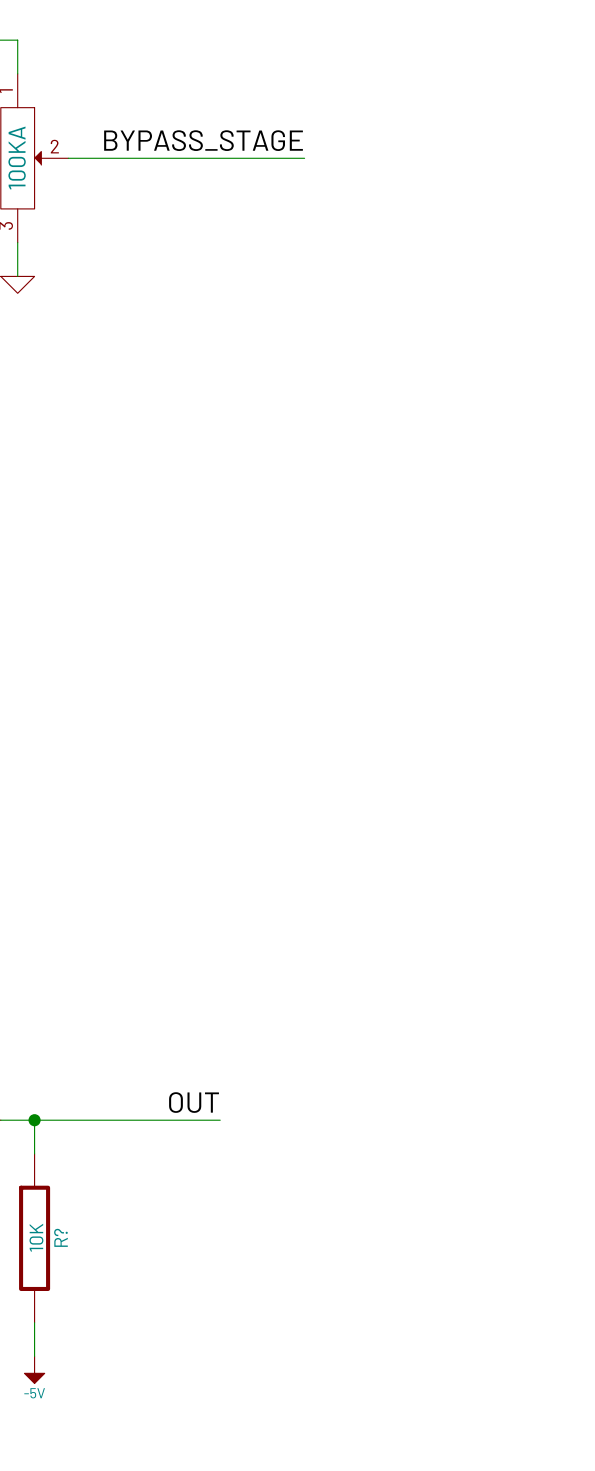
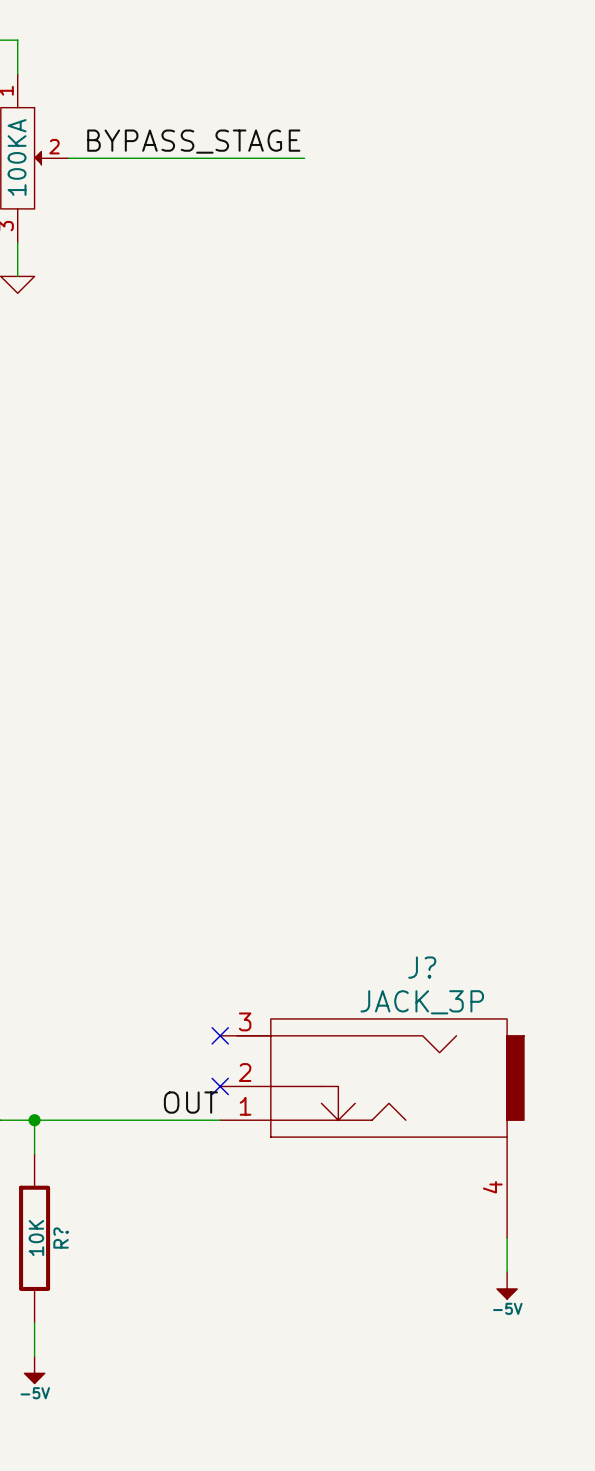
no-connect mark: none -> (220, 1035)
no-connect mark: none -> (220, 1086)
J?: none -> JACK_3P (372, 1128)
wire: none -> (507, 1238) (507, 1272)
power symbol: none -> -5V (507, 1285)

